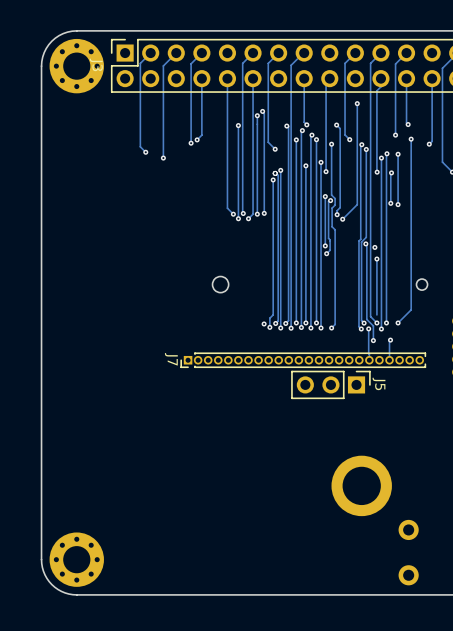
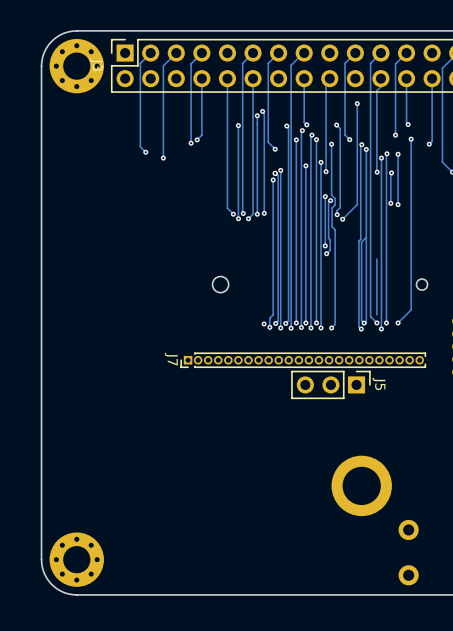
track: (365, 243) (366, 319) (373, 326) (373, 340) -> none
via: (365, 243) -> none
via: (374, 247) -> none
via: (376, 259) -> none
track: (368, 328) (369, 360) -> none
via: (368, 328) -> none
via: (373, 340) -> none
track: (390, 340) (389, 360) -> none
via: (390, 340) -> none

